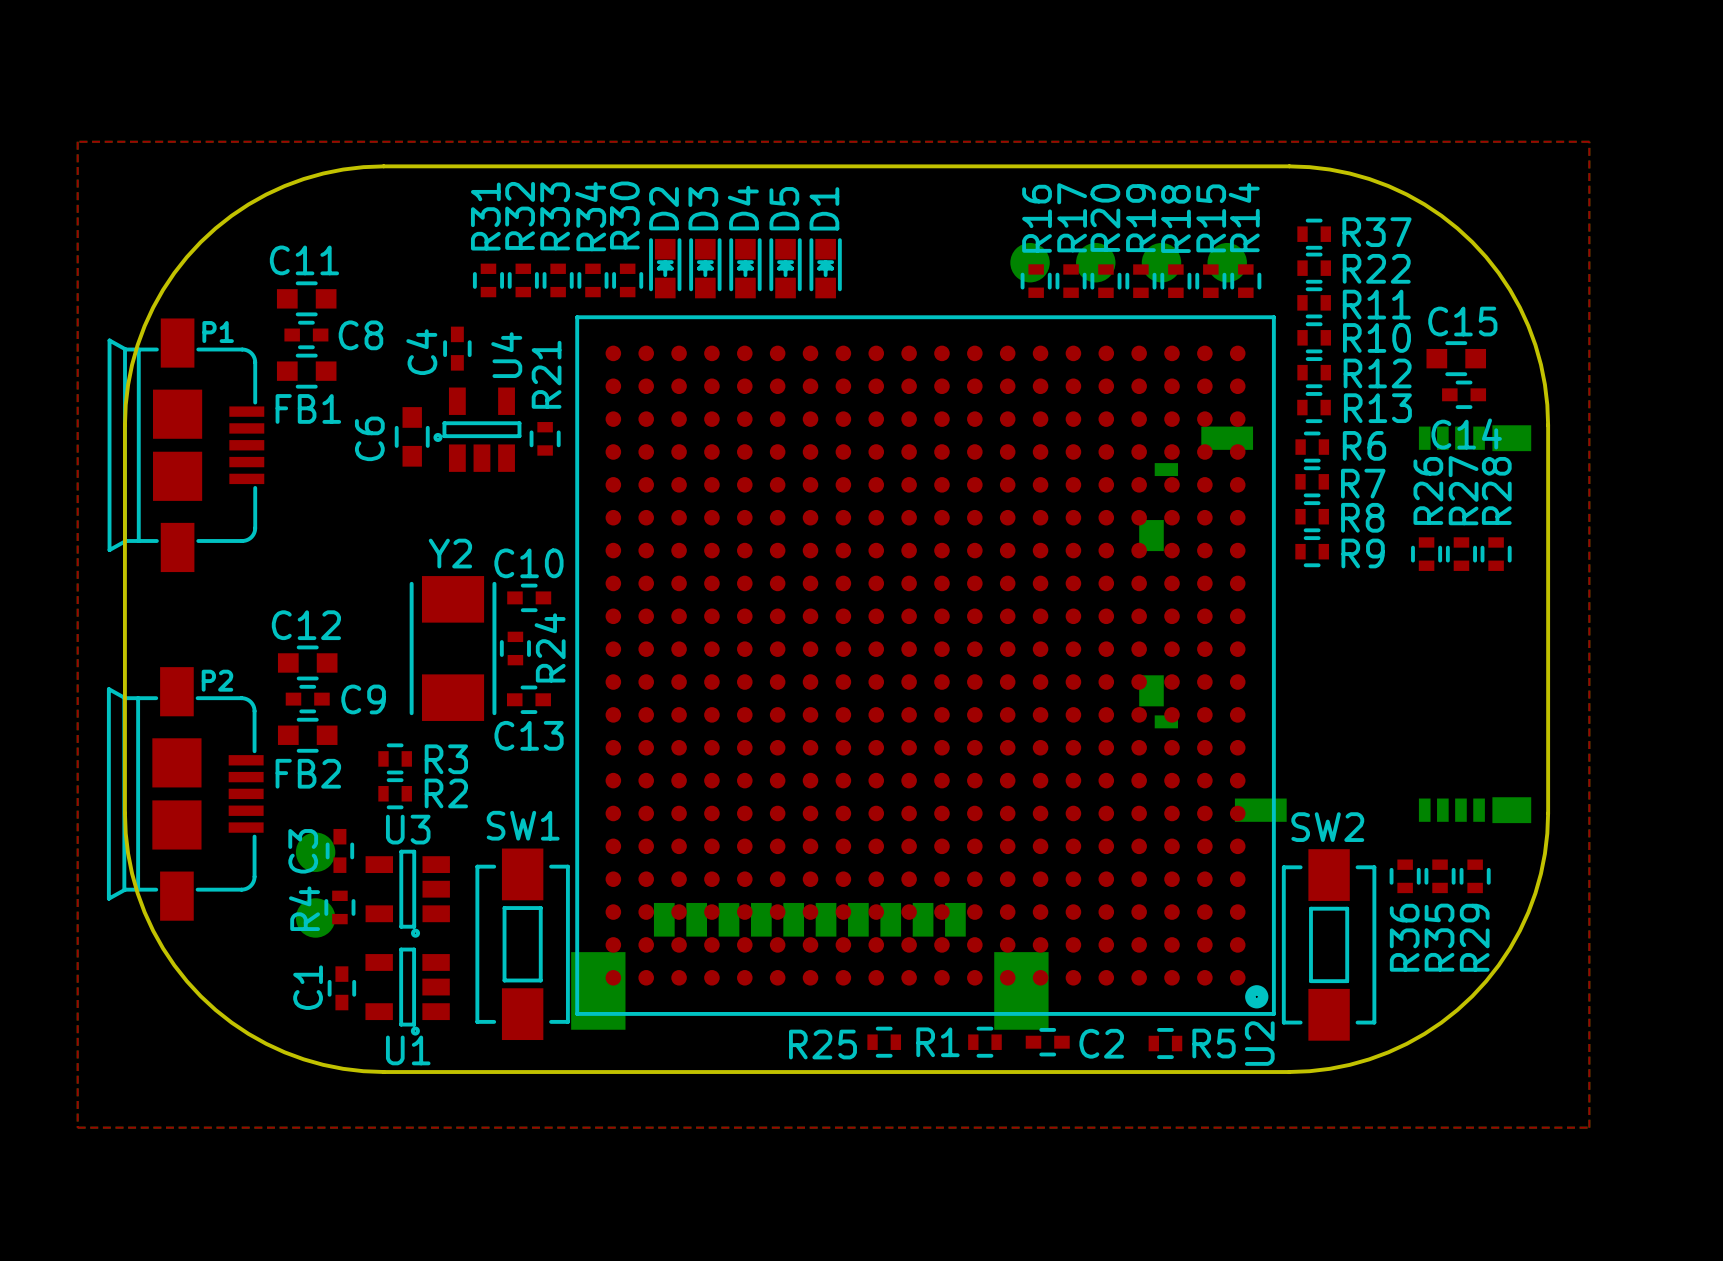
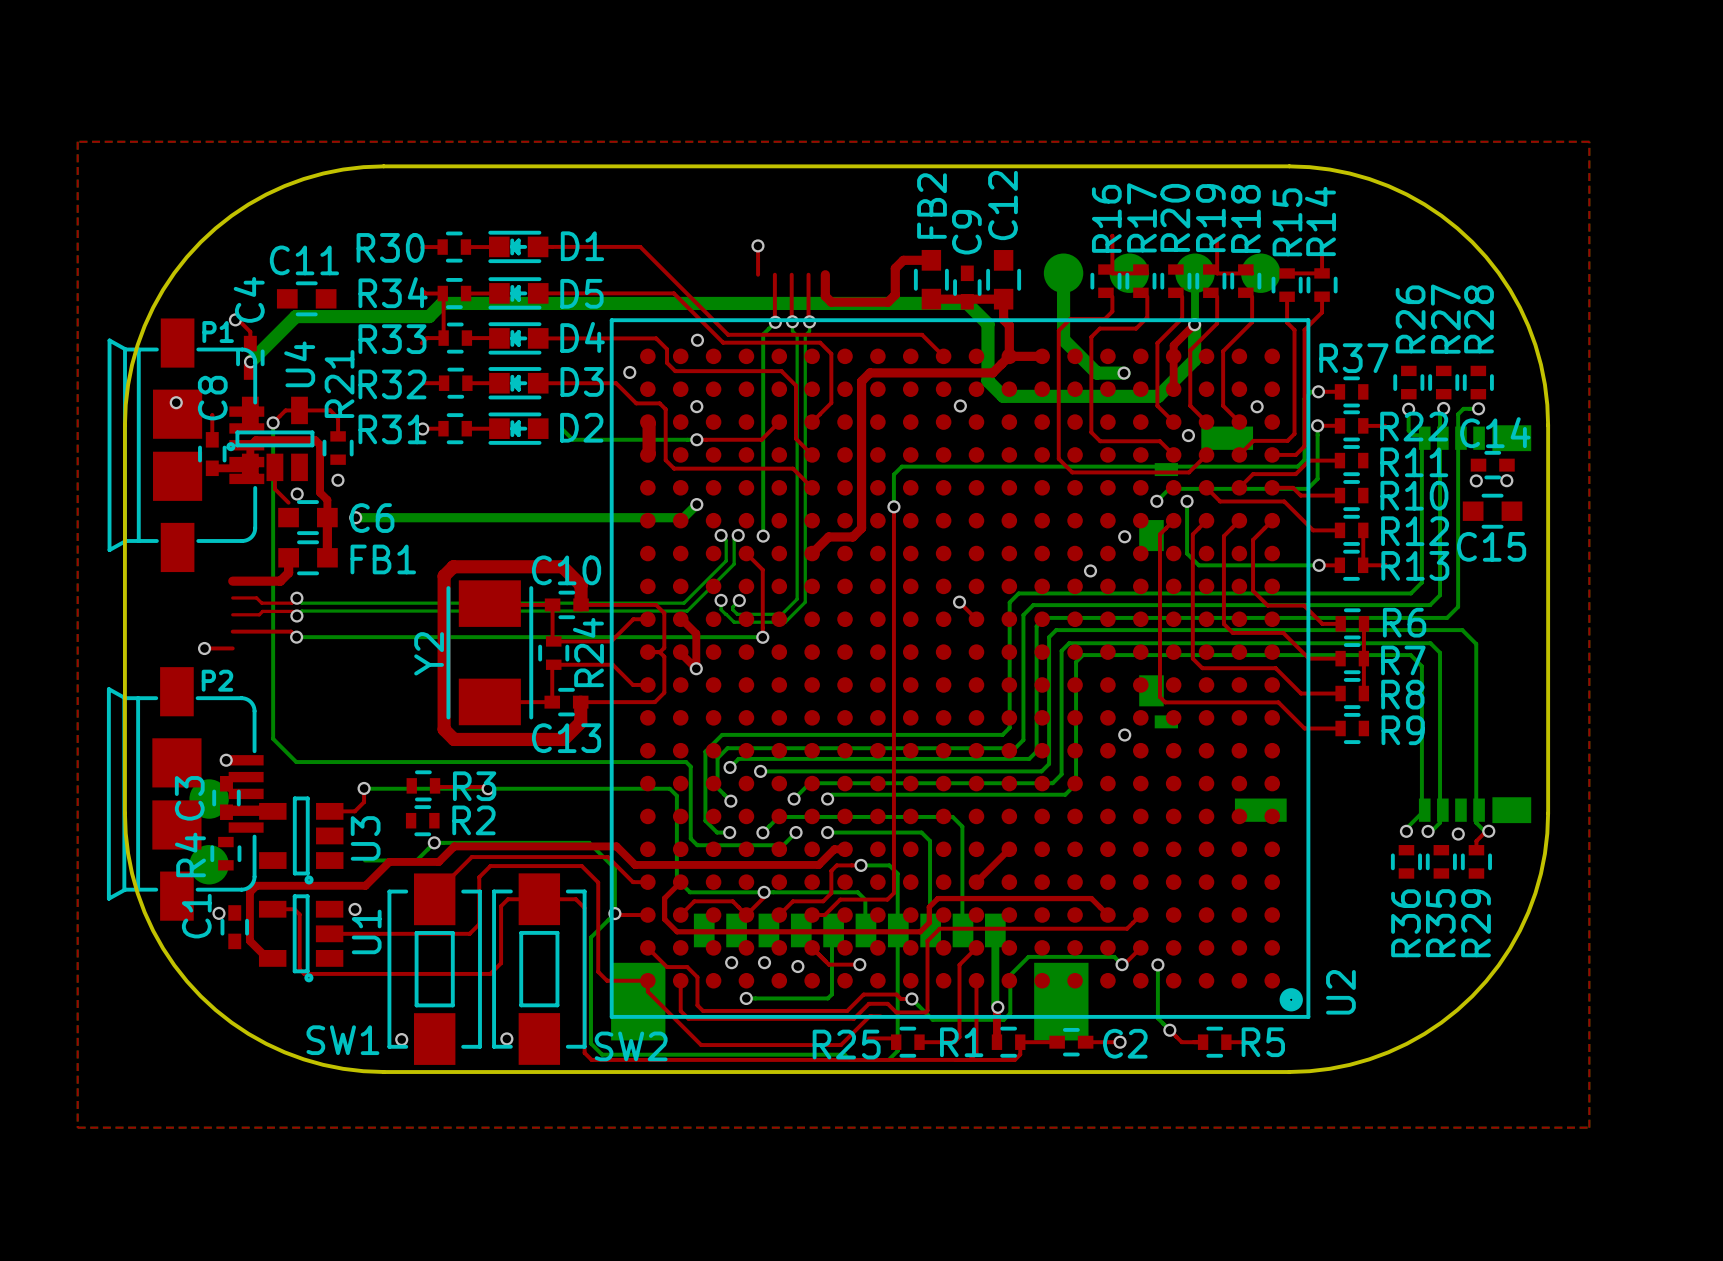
D2 name position: D2 (663, 208) -> D2 (581, 427)
D3 name position: D3 (703, 208) -> D3 (582, 381)
D4 name position: D4 (743, 208) -> D4 (582, 337)
D5 name position: D5 (784, 208) -> D5 (581, 293)
D1 name position: D1 (824, 208) -> D1 (582, 246)
R32 name position: R32 (520, 215) -> R32 (392, 384)
R30 name position: R30 (624, 215) -> R30 (390, 247)
R31 name position: R31 (485, 216) -> R31 (392, 429)
R33 name position: R33 (555, 216) -> R33 (392, 339)
R34 name position: R34 (590, 216) -> R34 (393, 292)
R20 name: R20 (1105, 217) -> R16 (1106, 218)
R14 name: R14 (1244, 217) -> R18 (1245, 218)
R19 name: R19 (1140, 218) -> R17 (1141, 217)
R18 name: R18 (1175, 218) -> R20 (1175, 217)
R15 name: R15 (1211, 218) -> R19 (1210, 218)
R37 name position: R37 (1376, 232) -> R37 (1353, 358)
R37 position: (1314, 234) -> (1351, 391)
top track: none -> (1112, 235) (1112, 273) (1147, 273)
top track: none -> (1217, 238) (1217, 273) (1252, 273)
via: none -> (757, 245)
top track: none -> (538, 246) (640, 246) (728, 334) (922, 334) (943, 356)
top track: none -> (758, 246) (758, 274)
top track: none -> (442, 247) (422, 247)
top track: none -> (465, 247) (499, 247)
top track: none -> (1322, 251) (1322, 273) (1287, 273)
top track: none -> (931, 260) (903, 260) (895, 268) (895, 294) (888, 302) (831, 302) (825, 296) (825, 274)
part: (1030, 262) -> none
part: (1095, 262) -> none
part: (1161, 262) -> none
part: (1227, 262) -> none
D2 rotation: 0° (665, 268) -> 90° counterclockwise (518, 428)
D2 position: (665, 268) -> (518, 428)
D3 rotation: 0° (705, 268) -> 90° counterclockwise (518, 383)
D3 position: (705, 268) -> (518, 383)
D4 rotation: 0° (745, 268) -> 90° counterclockwise (518, 338)
D4 position: (745, 268) -> (518, 338)
D5 rotation: 0° (785, 268) -> 90° counterclockwise (518, 293)
D5 position: (785, 268) -> (518, 293)
D1 rotation: 0° (825, 268) -> 90° counterclockwise (518, 246)
D1 position: (825, 268) -> (518, 246)
R22 position: (1314, 268) -> (1351, 425)
bottom track: none -> (1063, 273) (1063, 339) (1096, 373) (1124, 373)
part: none -> (1063, 273)
part: none -> (1129, 273)
bottom track: none -> (1195, 273) (1194, 360) (1158, 396) (1003, 396) (987, 381) (987, 324) (967, 303) (442, 303) (429, 316) (295, 316) (250, 361)
part: none -> (1195, 273)
part: none -> (1260, 273)
top track: none -> (774, 274) (775, 322)
top track: none -> (791, 274) (792, 321)
top track: none -> (808, 274) (809, 321)
R31 rotation: 0° (488, 280) -> 90° clockwise (455, 428)
R31 position: (488, 280) -> (455, 428)
R32 rotation: 0° (523, 280) -> 90° clockwise (455, 383)
R32 position: (523, 280) -> (455, 383)
R33 rotation: 0° (558, 280) -> 90° clockwise (455, 338)
R33 position: (558, 280) -> (455, 338)
R34 rotation: 0° (592, 280) -> 90° clockwise (454, 293)
R34 position: (592, 280) -> (454, 293)
R30 rotation: 0° (627, 280) -> 90° clockwise (454, 247)
R30 position: (627, 280) -> (454, 247)
R16: (1036, 281) -> none
R17: (1071, 281) -> none
R15: none -> (1287, 285)
R14: none -> (1322, 285)
top track: none -> (422, 290) (425, 293) (443, 294) (443, 338) (426, 338) (421, 343)
top track: none -> (466, 293) (499, 293)
top track: none -> (538, 293) (673, 293) (723, 342) (820, 342) (831, 353) (831, 402) (812, 422)
top track: none -> (1112, 296) (1112, 311) (1104, 319) (1070, 319) (1058, 330) (1058, 458) (1072, 472) (1189, 472) (1206, 454)
top track: none -> (1147, 296) (1147, 317) (1136, 328) (1099, 328) (1091, 337) (1091, 432) (1100, 441) (1159, 441) (1173, 454)
top track: none -> (1182, 296) (1182, 318) (1157, 343) (1157, 405) (1173, 422)
top track: none -> (1217, 296) (1217, 323) (1190, 350) (1190, 405) (1206, 422)
top track: none -> (1252, 296) (1252, 322) (1223, 351) (1223, 405) (1239, 422)
top track: none -> (1287, 296) (1287, 322) (1294, 330) (1294, 433) (1287, 440) (1253, 440) (1239, 454)
top track: none -> (1322, 296) (1322, 312) (1304, 329) (1304, 446) (1295, 454) (1272, 454)
top track: none -> (1003, 299) (969, 299) (967, 301) (964, 299) (931, 299) (1003, 299)
top track: none -> (1003, 299) (1003, 319) (1009, 325) (1009, 356)
R11 position: (1314, 302) -> (1351, 460)
top track: none -> (235, 319) (238, 319) (250, 331) (250, 343)
via: none -> (235, 319)
bottom track: none -> (792, 321) (792, 331) (797, 335) (797, 599) (781, 614) (737, 614) (732, 607) (739, 600)
via: none -> (792, 321)
bottom track: none -> (809, 321) (809, 331) (805, 335) (805, 602) (785, 622) (734, 622) (726, 614)
via: none -> (809, 321)
C15 name position: C15 (1462, 321) -> C15 (1491, 546)
bottom track: none -> (775, 322) (763, 334) (763, 536)
via: none -> (775, 322)
top track: none -> (1194, 324) (1173, 345) (1173, 389)
via: none -> (1194, 324)
C8 rotation: 0° (306, 334) -> 90° clockwise (212, 454)
C8 position: (306, 334) -> (212, 454)
C8 name position: C8 (360, 335) -> C8 (212, 398)
R10 position: (1314, 337) -> (1351, 495)
top track: none -> (466, 338) (499, 338)
top track: none -> (538, 338) (656, 338) (667, 349) (667, 362) (675, 371) (781, 371) (796, 385) (796, 438) (812, 454)
via: none -> (697, 340)
C4 position: (457, 348) -> (250, 357)
C4 name position: C4 (421, 352) -> C4 (249, 299)
top track: none -> (1009, 356) (1042, 356)
top track: none -> (1009, 356) (992, 372) (870, 372) (861, 381) (861, 528) (852, 536) (828, 536) (812, 553)
C15 position: (1456, 358) -> (1492, 511)
via: none -> (250, 361)
FB1 position: (306, 371) -> (308, 557)
via: none -> (629, 372)
R12 position: (1314, 372) -> (1351, 530)
via: none -> (1124, 373)
top track: none -> (444, 383) (422, 383)
top track: none -> (467, 383) (499, 383)
top track: none -> (538, 383) (616, 383) (636, 403) (659, 403) (665, 409) (665, 460) (674, 468) (792, 468) (812, 487)
top track: none -> (1318, 391) (1339, 391)
bottom track: none -> (1318, 391) (1311, 391) (1304, 398) (1304, 459) (1297, 466) (901, 466) (893, 474) (893, 506)
via: none -> (1318, 391)
C14 position: (1464, 394) -> (1492, 465)
via: none -> (176, 402)
via: none -> (960, 405)
via: none -> (696, 406)
via: none -> (1257, 406)
R13 position: (1314, 407) -> (1351, 565)
FB1 name position: FB1 (308, 408) -> FB1 (383, 559)
bottom track: none -> (1443, 408) (1440, 412) (1440, 595) (1430, 605) (1033, 605) (1023, 615) (1023, 740) (1015, 748) (727, 748) (717, 758) (717, 787) (730, 801)
via: none -> (1443, 408)
bottom track: none -> (1478, 408) (1463, 408) (1458, 414) (1458, 606) (1447, 617) (1044, 617) (1036, 626) (1036, 751) (1029, 758) (738, 758) (730, 767)
via: none -> (1478, 408)
bottom track: none -> (1408, 409) (1408, 430) (1413, 435) (1421, 435) (1421, 582) (1410, 593) (1018, 593) (1009, 602) (1009, 727) (1002, 734) (722, 734) (705, 751) (705, 820) (717, 832) (729, 832)
via: none -> (1408, 409)
top track: none -> (212, 415) (212, 439)
top track: none -> (273, 422) (285, 410) (330, 410) (338, 418) (338, 436)
bottom track: none -> (273, 422) (273, 738) (296, 762) (686, 762) (690, 766) (690, 838) (697, 845) (783, 845) (796, 832)
via: none -> (273, 422)
top track: none -> (647, 422) (647, 454)
top track: none -> (779, 422) (761, 439) (696, 439)
top track: none -> (1317, 425) (1339, 425)
bottom track: none -> (1317, 425) (1317, 478) (1307, 488) (1169, 488) (1156, 501)
via: none -> (1317, 425)
top track: none -> (1363, 425) (1384, 425)
via: none -> (422, 428)
top track: none -> (423, 428) (443, 428)
top track: none -> (466, 428) (499, 428)
bottom track: none -> (562, 428) (572, 439) (696, 439)
U4 position: (477, 429) -> (270, 438)
C14 name position: C14 (1466, 433) -> C14 (1495, 432)
via: none -> (1188, 435)
C6 rotation: 0° (412, 436) -> 90° clockwise (307, 517)
C6 position: (412, 436) -> (307, 517)
C6 name position: C6 (369, 438) -> C6 (372, 518)
R21 position: (545, 438) -> (338, 448)
via: none -> (696, 439)
R6 position: (1312, 447) -> (1352, 623)
top track: none -> (1339, 460) (1309, 460) (1295, 474) (1253, 474) (1239, 487)
top track: none -> (274, 467) (274, 489) (288, 502)
top track: none -> (211, 468) (249, 468) (250, 445) (255, 440) (315, 440) (320, 444) (320, 492) (327, 499) (327, 557)
via: none -> (337, 480)
via: none -> (1476, 480)
via: none -> (1506, 480)
R7 position: (1312, 481) -> (1352, 658)
top track: none -> (1206, 487) (1220, 501) (1284, 501) (1313, 530) (1339, 530)
top track: none -> (1272, 487) (1293, 487) (1300, 495) (1339, 495)
via: none -> (297, 494)
via: none -> (1156, 501)
bottom track: none -> (1187, 501) (1187, 553) (1198, 565) (1319, 565)
via: none -> (1187, 501)
bottom track: none -> (696, 504) (683, 517) (355, 517)
via: none -> (696, 504)
top track: none -> (893, 506) (893, 893) (887, 899) (840, 899) (824, 915) (812, 915)
via: none -> (893, 506)
R8 position: (1312, 516) -> (1352, 693)
via: none -> (355, 517)
top track: none -> (1173, 520) (1159, 534) (1159, 697) (1165, 702) (1278, 702) (1304, 728) (1340, 728)
top track: none -> (1206, 520) (1192, 534) (1192, 658) (1202, 668) (1275, 668) (1301, 693) (1340, 693)
top track: none -> (1239, 520) (1223, 536) (1223, 624) (1232, 632) (1283, 632) (1308, 658) (1340, 658)
top track: none -> (1272, 520) (1253, 539) (1253, 590) (1267, 605) (1304, 605) (1322, 623) (1340, 623)
top track: none -> (1363, 530) (1363, 565)
bottom track: none -> (721, 535) (726, 540) (726, 560) (684, 603) (301, 603) (296, 598)
via: none -> (721, 535)
bottom track: none -> (738, 535) (734, 539) (734, 564) (687, 611) (301, 611) (296, 616)
via: none -> (738, 535)
via: none -> (763, 536)
via: none -> (1124, 536)
R9 position: (1312, 551) -> (1352, 728)
Y2 name rotation: 0° (450, 553) -> 90° counterclockwise (429, 653)
Y2 name position: Y2 (450, 553) -> Y2 (429, 653)
top track: none -> (746, 553) (762, 569) (762, 637)
R26 position: (1426, 554) -> (1408, 382)
R27 position: (1461, 554) -> (1443, 382)
R28 position: (1496, 554) -> (1478, 382)
top track: none -> (288, 557) (288, 572) (280, 581) (232, 581)
top track: none -> (1319, 565) (1339, 565)
via: none -> (1319, 565)
top track: none -> (1363, 565) (1385, 565)
via: none -> (1090, 570)
top track: none -> (232, 597) (256, 597) (261, 603) (291, 603) (296, 598)
C10 position: (529, 597) -> (566, 604)
via: none -> (296, 598)
bottom track: none -> (721, 600) (721, 609) (725, 614)
via: none -> (721, 600)
via: none -> (739, 600)
top track: none -> (959, 602) (976, 619)
via: none -> (959, 602)
top track: none -> (489, 603) (552, 604) (553, 641) (611, 641) (633, 619) (647, 619)
top track: none -> (232, 614) (259, 614) (262, 611) (292, 611) (296, 616)
via: none -> (296, 616)
top track: none -> (680, 619) (696, 633) (696, 668) (680, 652)
top track: none -> (1363, 623) (1363, 693)
top track: none -> (232, 631) (291, 631) (296, 637)
bottom track: none -> (296, 637) (762, 637)
via: none -> (296, 637)
via: none -> (762, 637)
top track: none -> (204, 648) (232, 648)
via: none -> (204, 648)
Y2 position: (453, 648) -> (489, 652)
R24 position: (515, 648) -> (553, 653)
top track: none -> (647, 652) (660, 652) (664, 647) (664, 613) (656, 604) (581, 604) (581, 585) (562, 566) (453, 566) (444, 576) (444, 729) (454, 739) (563, 739) (580, 722) (580, 702) (654, 702) (664, 692) (664, 656) (659, 652)
C12 rotation: 0° (307, 662) -> 90° clockwise (1003, 279)
C12 position: (307, 662) -> (1003, 279)
U2 position: (925, 665) -> (960, 668)
via: none -> (696, 668)
top track: none -> (647, 684) (632, 684) (612, 664) (553, 664) (552, 702) (490, 702)
C9 rotation: 0° (307, 699) -> 90° clockwise (967, 287)
C9 position: (307, 699) -> (967, 287)
C9 name position: C9 (363, 699) -> C9 (966, 232)
C13 position: (528, 699) -> (566, 702)
FB2 rotation: 0° (307, 735) -> 90° clockwise (931, 279)
FB2 position: (307, 735) -> (931, 279)
via: none -> (1124, 735)
R3 position: (395, 758) -> (423, 785)
via: none -> (226, 760)
via: none -> (730, 767)
bottom track: none -> (760, 771) (1041, 771) (1049, 763) (1049, 637) (1056, 630) (1462, 630) (1476, 643) (1476, 822) (1484, 831) (1488, 831)
via: none -> (760, 771)
FB2 name position: FB2 (308, 773) -> FB2 (932, 206)
top track: none -> (435, 785) (486, 786) (488, 788)
top track: none -> (364, 788) (364, 802) (354, 811) (329, 811)
bottom track: none -> (364, 788) (669, 788) (676, 795) (676, 879) (690, 892) (857, 892) (865, 899) (865, 929)
via: none -> (364, 788)
via: none -> (488, 788)
R2 position: (395, 793) -> (422, 820)
part: none -> (209, 799)
bottom track: none -> (794, 799) (809, 783) (1052, 783) (1061, 774) (1061, 650) (1069, 643) (1430, 643) (1440, 652) (1440, 822) (1431, 831) (1428, 831)
via: none -> (794, 799)
bottom track: none -> (827, 799) (831, 794) (1065, 794) (1076, 783) (1076, 662) (1082, 655) (1410, 655) (1421, 666) (1421, 813) (1406, 828) (1406, 831)
via: none -> (827, 799)
via: none -> (730, 801)
SW1 name position: SW1 (523, 825) -> SW1 (342, 1040)
SW2 name position: SW2 (1327, 827) -> SW2 (631, 1046)
U3 name rotation: 0° (408, 829) -> 90° counterclockwise (365, 838)
via: none -> (1406, 831)
via: none -> (1428, 831)
top track: none -> (1488, 831) (1486, 831) (1476, 841) (1476, 850)
via: none -> (1488, 831)
via: none -> (729, 832)
bottom track: none -> (762, 832) (778, 816) (952, 816) (962, 826) (962, 929)
via: none -> (762, 832)
via: none -> (796, 832)
bottom track: none -> (827, 832) (921, 832) (930, 840) (930, 929)
via: none -> (827, 832)
via: none -> (1458, 834)
via: none -> (434, 842)
top track: none -> (845, 849) (834, 849) (818, 864) (635, 864) (616, 846) (454, 846) (438, 861) (389, 861) (365, 885) (256, 885) (249, 892) (249, 940) (267, 958) (272, 958)
top track: none -> (1009, 849) (976, 882)
C3 position: (339, 850) -> (226, 797)
part: (315, 852) -> none
bottom track: none -> (364, 860) (416, 860) (434, 842) (589, 842) (614, 868) (614, 913) (590, 937) (590, 1043) (602, 1054) (844, 1054) (849, 1060) (888, 1060) (897, 1050) (897, 873) (889, 865) (861, 865)
part: none -> (209, 864)
top track: none -> (861, 865) (836, 865) (831, 870) (831, 893) (823, 901) (792, 901) (779, 915)
via: none -> (861, 865)
R36 position: (1405, 876) -> (1406, 861)
R35 position: (1440, 876) -> (1441, 861)
R29 position: (1475, 876) -> (1476, 861)
top track: none -> (647, 882) (633, 882) (607, 857) (471, 857) (434, 894) (434, 899)
top track: none -> (680, 882) (664, 898) (664, 919) (677, 931) (920, 931) (929, 922) (929, 907) (937, 898) (1091, 898) (1107, 915)
top track: none -> (764, 892) (764, 897) (746, 915) (732, 901) (694, 901) (680, 915)
via: none -> (764, 892)
U3 position: (407, 893) -> (301, 840)
R4 position: (339, 907) -> (225, 853)
top track: none -> (272, 909) (294, 909) (299, 914) (299, 969) (304, 973) (490, 973) (501, 963) (501, 906) (507, 899) (575, 899) (584, 908) (584, 1052) (591, 1059) (969, 1059) (976, 1053) (976, 980)
via: none -> (355, 909)
via: none -> (218, 913)
top track: none -> (614, 913) (647, 915)
via: none -> (614, 913)
top track: none -> (1140, 915) (1127, 928) (939, 928) (927, 940) (927, 1010) (925, 1012) (896, 1012) (887, 1003) (868, 1003) (853, 1018) (688, 1018) (680, 1010) (680, 980)
part: (315, 917) -> none
bottom track: none -> (831, 925) (831, 994) (827, 998) (746, 998)
bottom track: none -> (994, 929) (994, 1004) (997, 1007) (995, 1004) (995, 930)
top track: none -> (329, 933) (469, 933) (479, 924) (479, 877) (490, 866) (581, 866) (598, 882) (598, 971) (607, 980) (647, 980) (647, 991) (701, 1045) (840, 1045) (869, 1016) (880, 1016)
SW1 position: (522, 944) -> (434, 969)
SW2 position: (1329, 944) -> (539, 969)
top track: none -> (647, 947) (667, 967) (687, 967) (697, 977) (697, 1005) (703, 1010) (847, 1010) (863, 994) (896, 994) (901, 998) (911, 998)
top track: none -> (812, 947) (828, 964) (859, 964)
top track: none -> (976, 947) (959, 964) (959, 1037) (954, 1042) (919, 1042)
top track: none -> (1140, 947) (1122, 964)
via: none -> (731, 962)
via: none -> (764, 962)
via: none -> (859, 964)
bottom track: none -> (1122, 964) (1114, 956) (1028, 956) (1010, 975) (1010, 1013) (1003, 1019) (932, 1019) (911, 998)
via: none -> (1122, 964)
bottom track: none -> (1157, 964) (1157, 1018) (1169, 1030)
via: none -> (1157, 964)
via: none -> (797, 966)
part position: (809, 966) -> (849, 977)
C1 name position: C1 (308, 987) -> C1 (196, 916)
C1 position: (341, 988) -> (234, 927)
U1 position: (407, 991) -> (301, 938)
via: none -> (746, 998)
via: none -> (911, 998)
top track: none -> (997, 1007) (996, 1042)
via: none -> (997, 1007)
top track: none -> (1169, 1030) (1181, 1042) (1203, 1042)
via: none -> (1169, 1030)
via: none -> (506, 1038)
top track: none -> (868, 1038) (892, 1038) (896, 1042)
via: none -> (401, 1039)
R25 position: (884, 1042) -> (907, 1042)
R1 position: (984, 1042) -> (1008, 1042)
C2 position: (1047, 1042) -> (1071, 1042)
top track: none -> (1057, 1042) (1020, 1042) (1020, 1054) (1014, 1059) (956, 1059)
top track: none -> (1085, 1042) (1120, 1042)
via: none -> (1120, 1042)
top track: none -> (1226, 1042) (1246, 1042)
R5 position: (1165, 1043) -> (1214, 1042)
U2 name position: U2 (1259, 1043) -> U2 (1340, 992)
U1 name rotation: 0° (408, 1050) -> 90° counterclockwise (366, 931)
U1 name position: U1 (408, 1050) -> U1 (366, 931)

